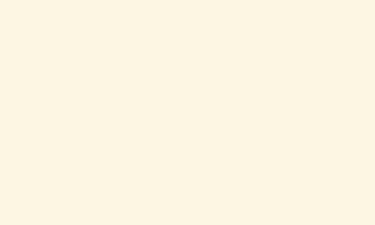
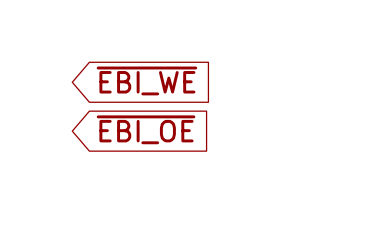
global label: none -> ~{EBI_WE} (146, 80)
global label: none -> ~{EBI_OE} (146, 129)

